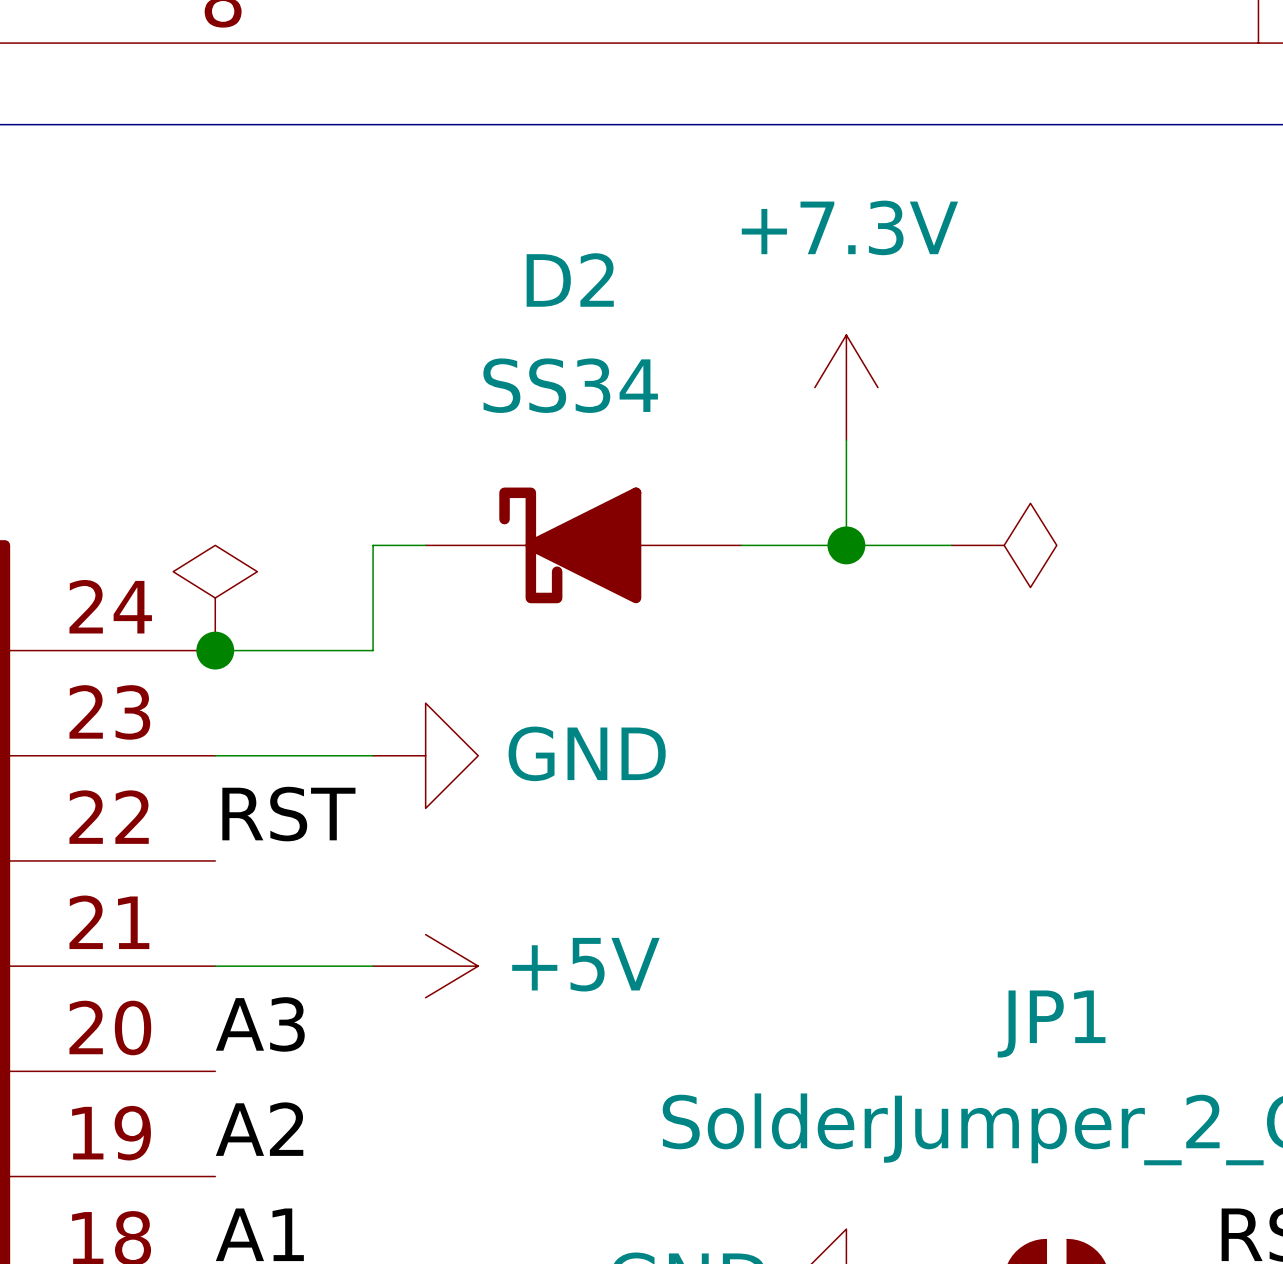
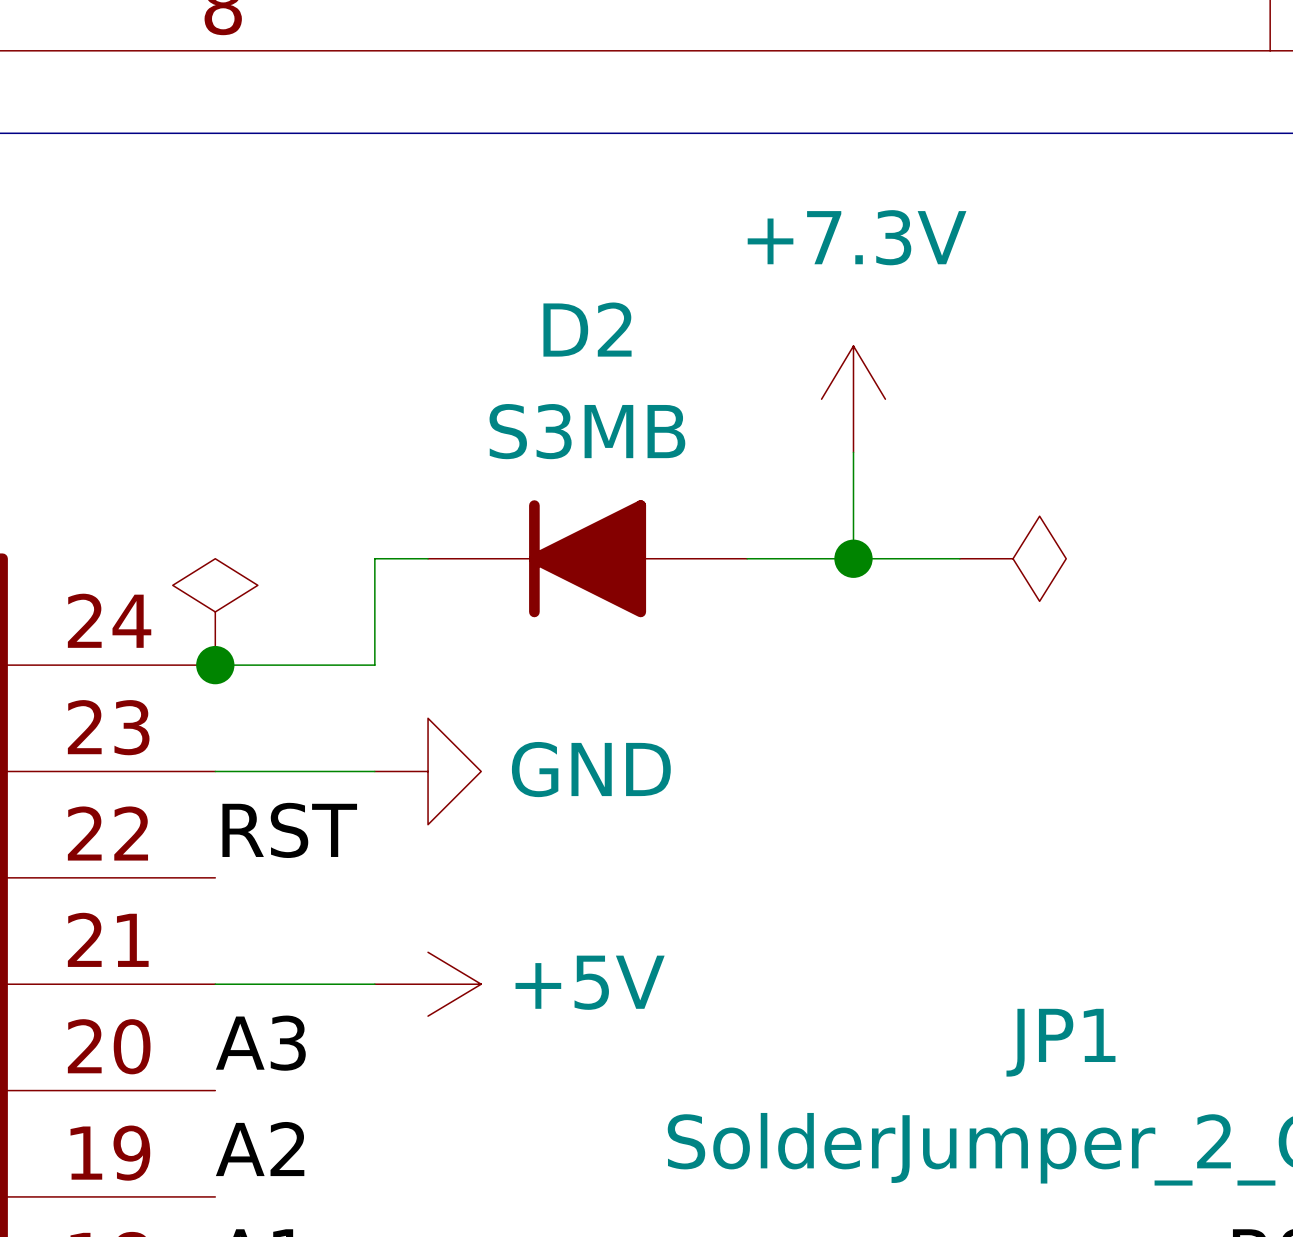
D2 name position: D2 (570, 279) -> D2 (587, 329)
D2 value: SS34 (570, 385) -> S3MB (587, 431)
D2 symbol: [425, 487, 742, 604] -> [428, 500, 748, 618]

